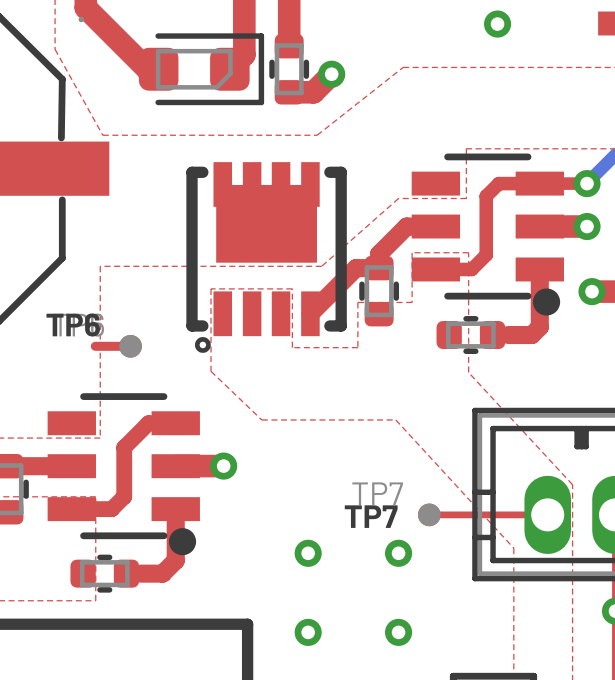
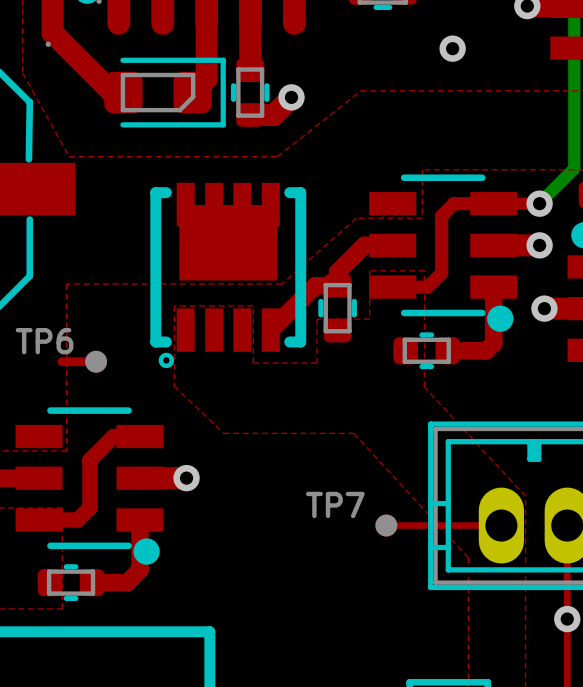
text: TP6 (73, 324) -> none
text: TP7 (371, 516) -> none
via: (308, 553) -> none
via: (398, 553) -> none
via: (308, 632) -> none
via: (398, 632) -> none

